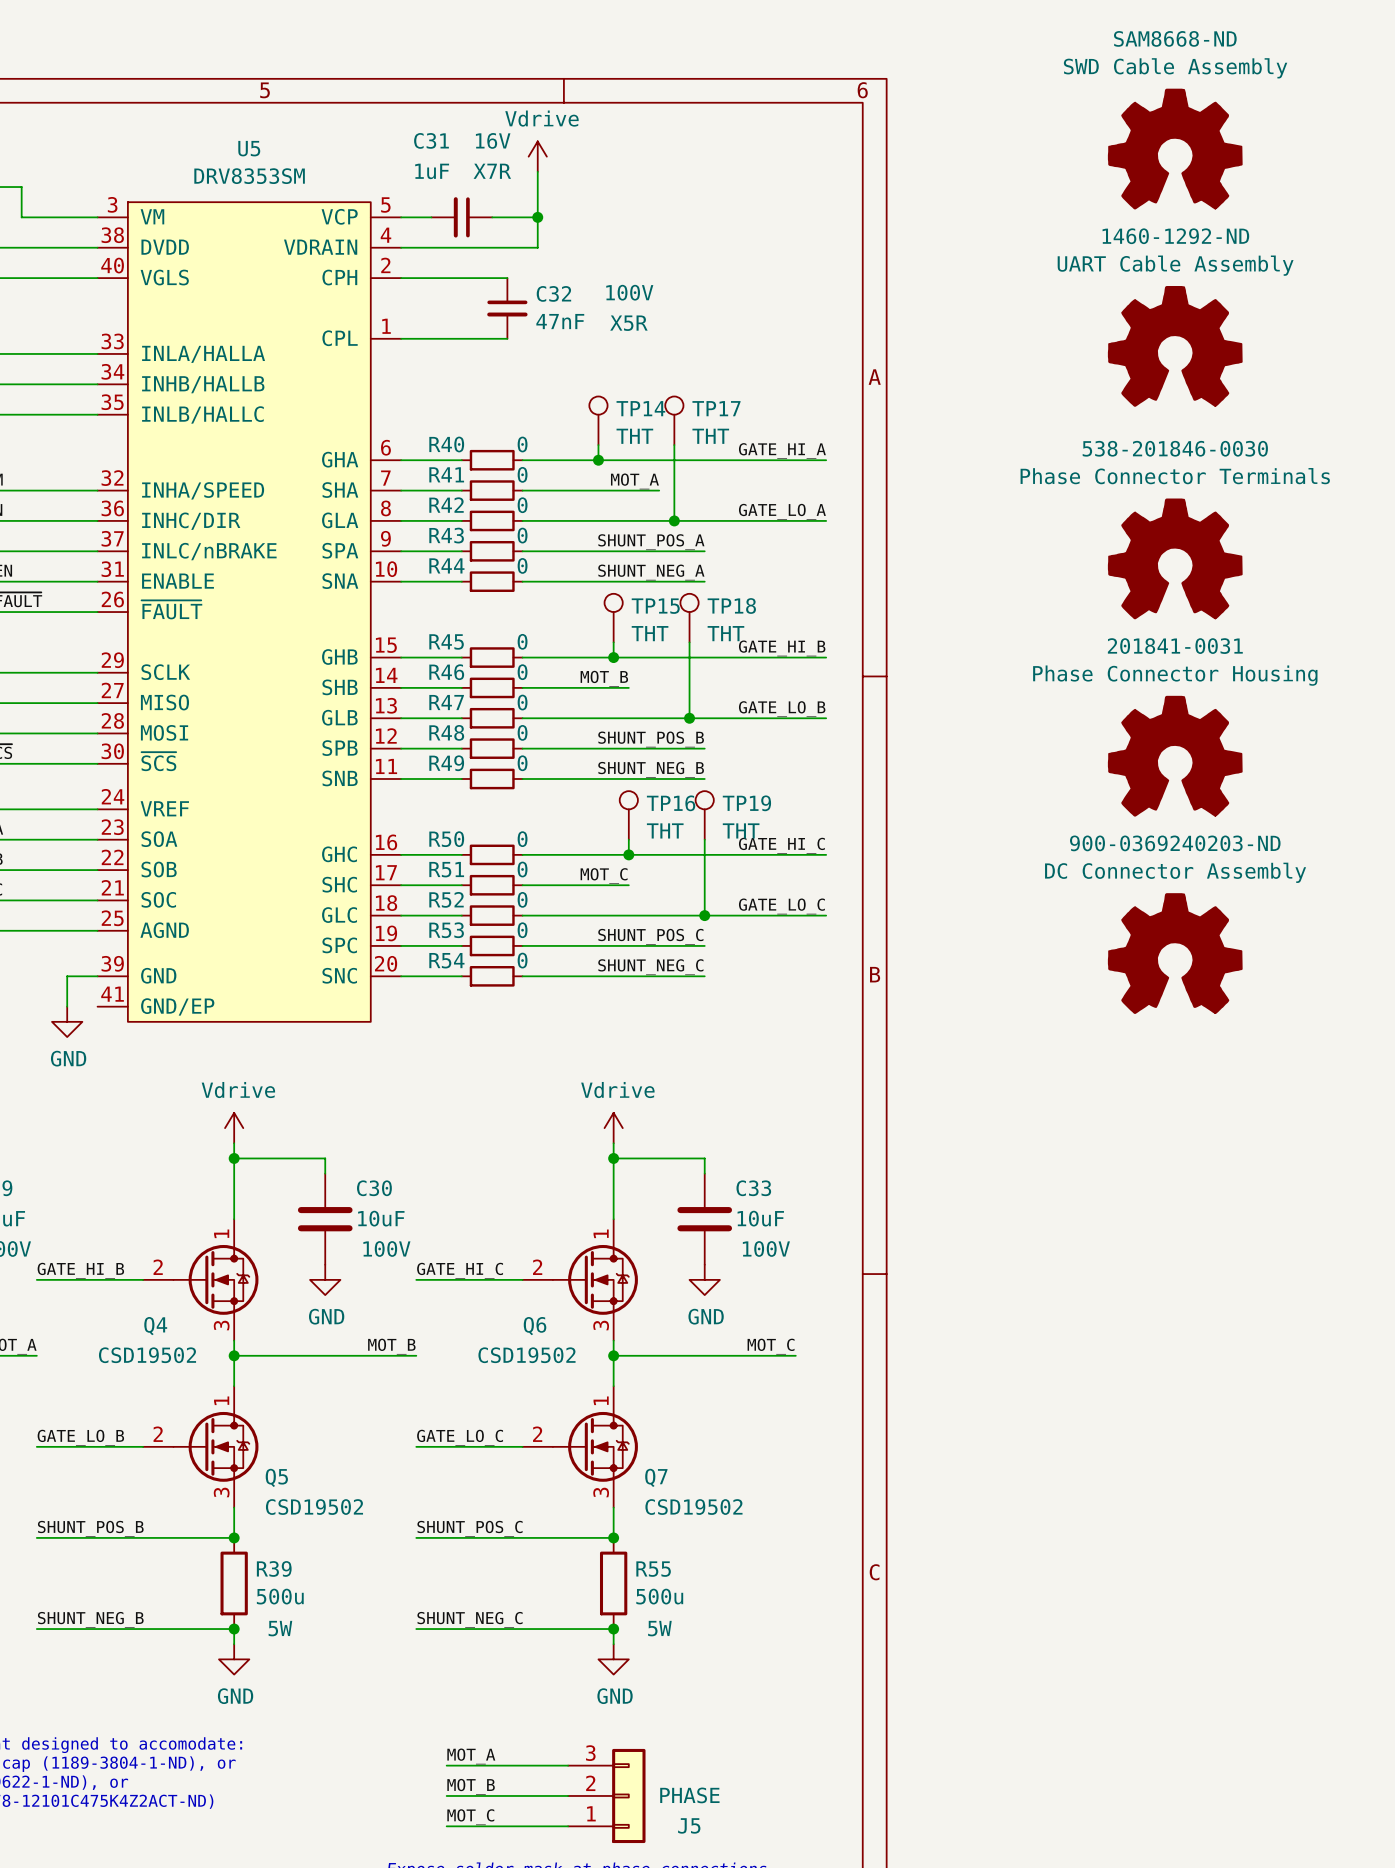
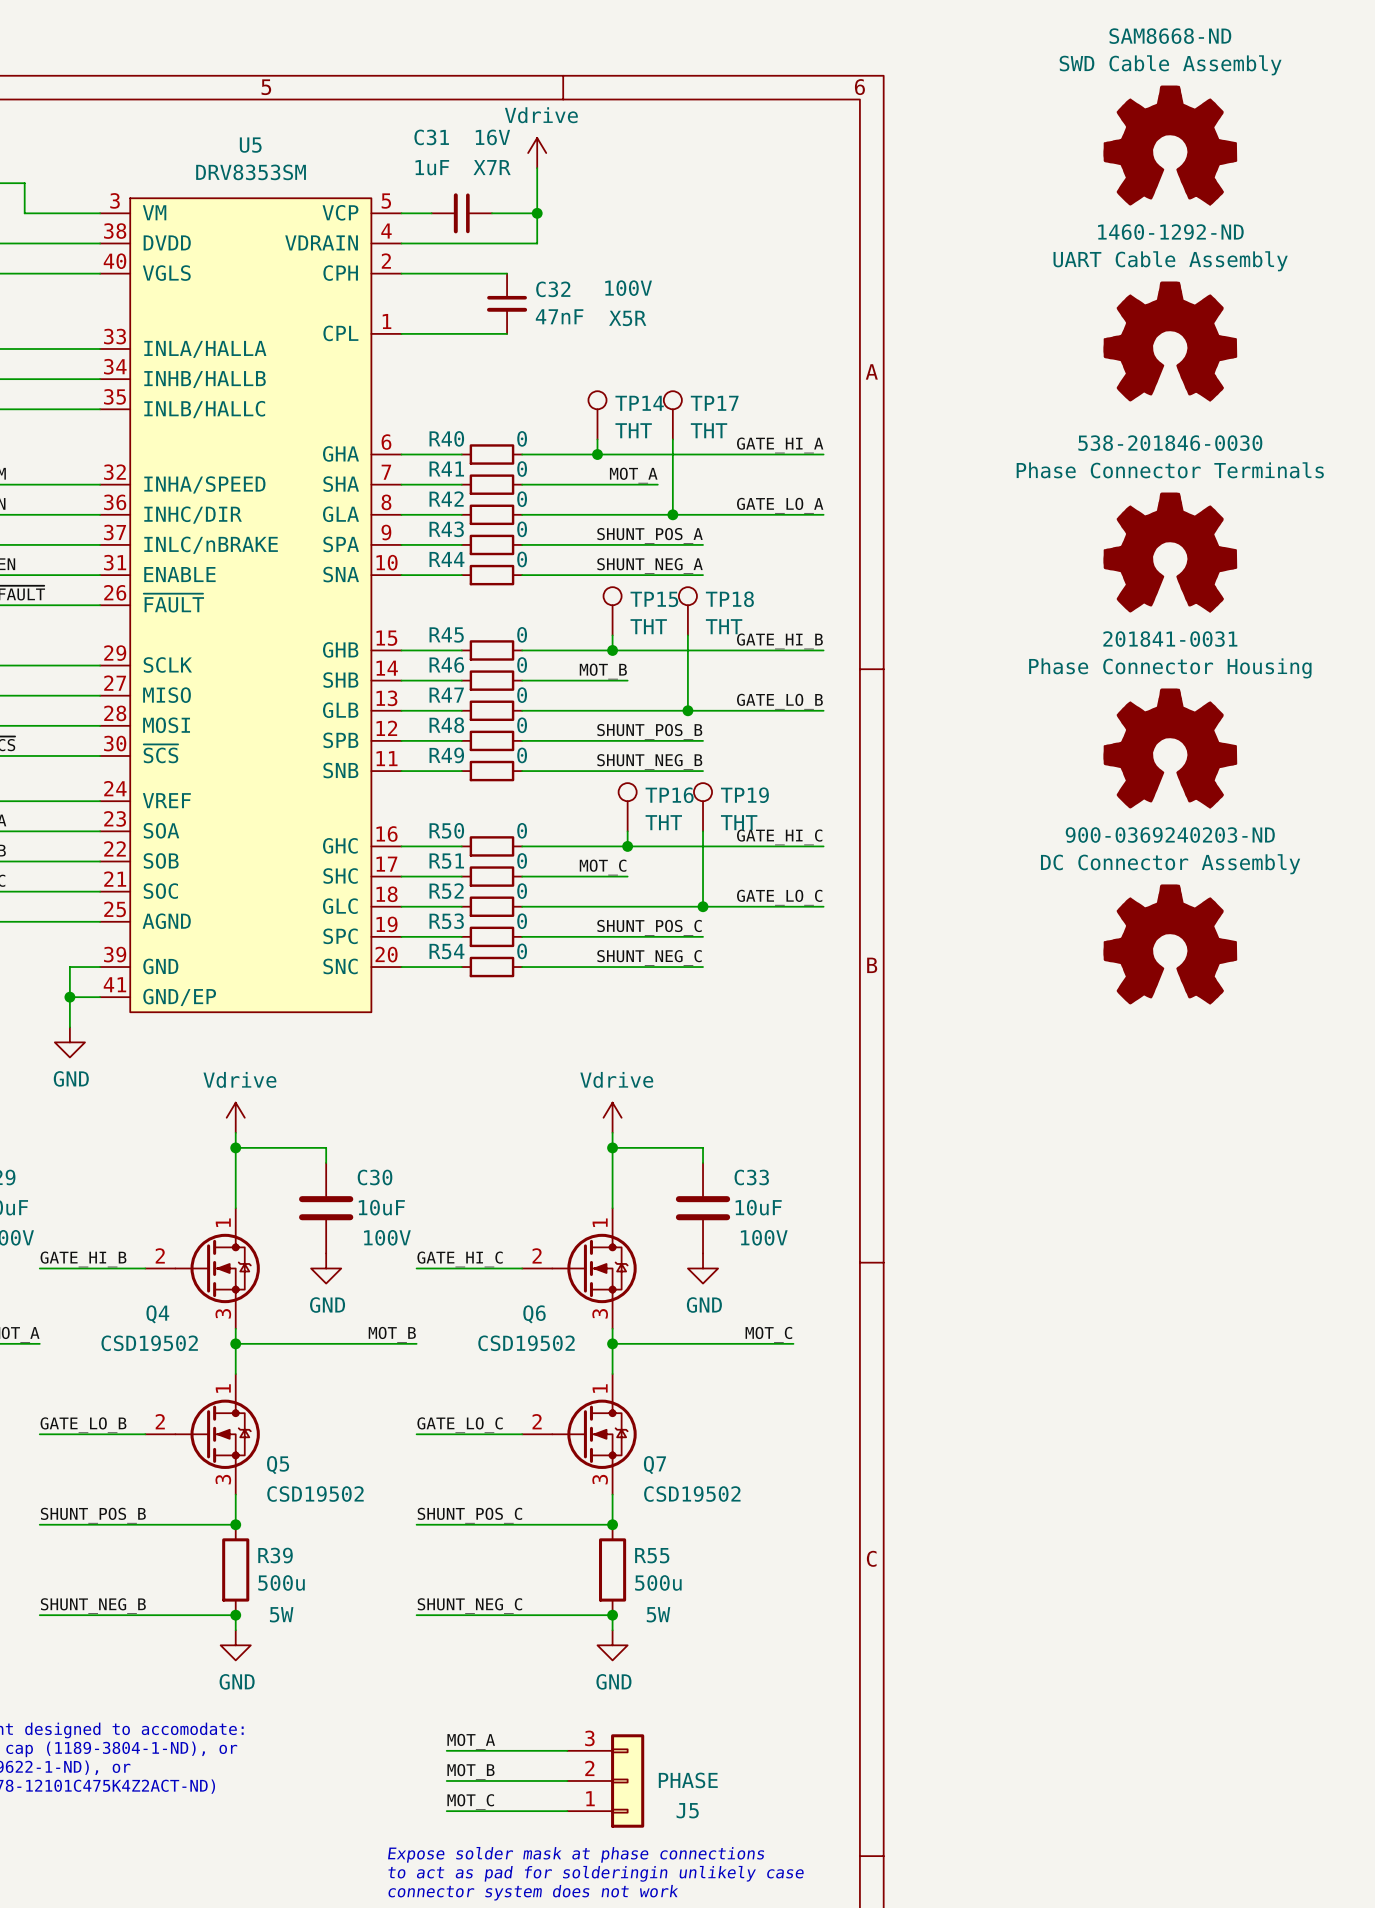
junction: none -> (69, 997)
wire: none -> (100, 997) (69, 997) (69, 1027)
power symbol position: GND (67, 1021) -> GND (69, 1042)

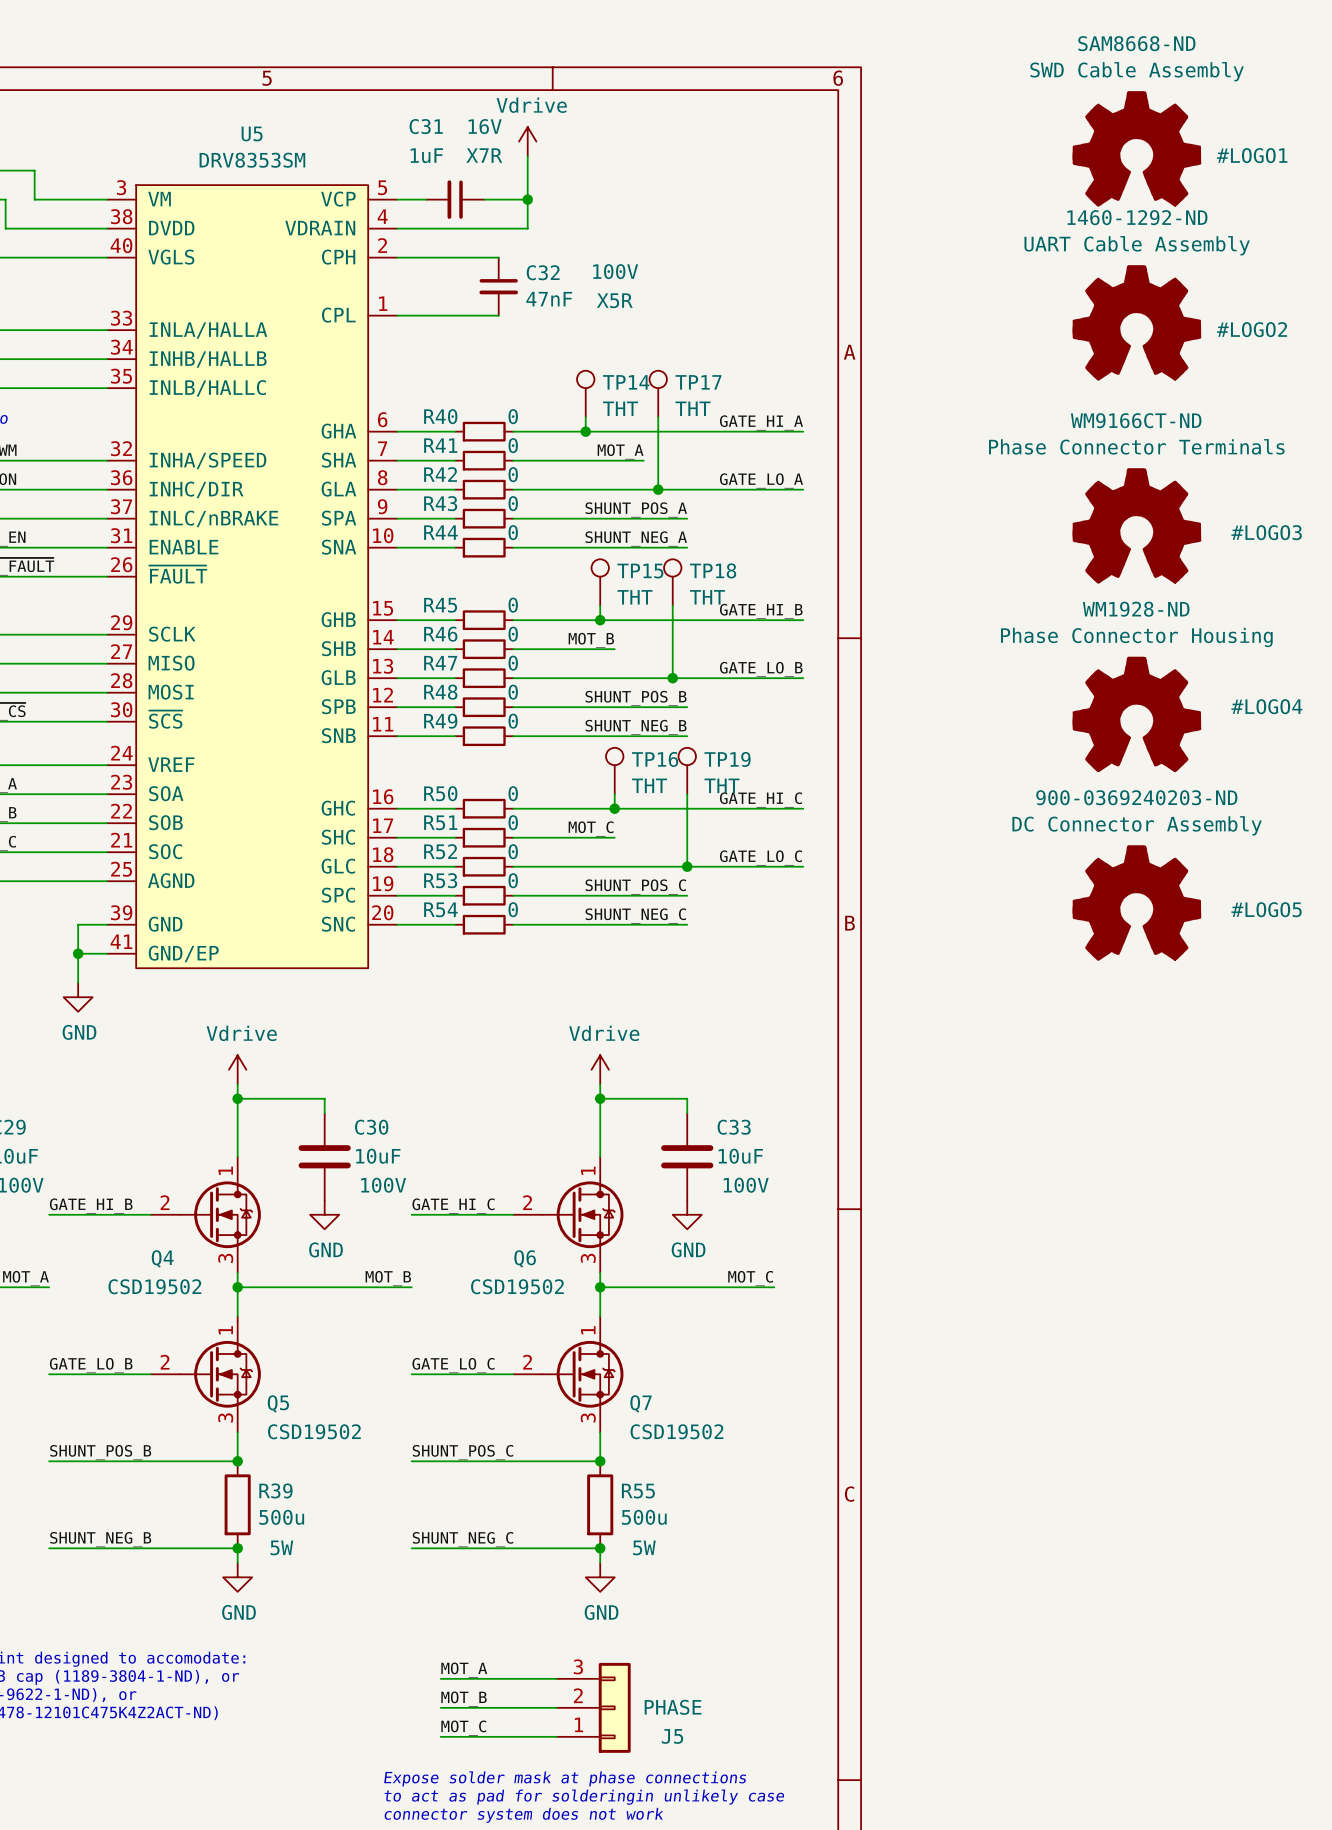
power symbol: (1170, 145) -> none
#LOGO1: none -> (1136, 148)
#LOGO2 name: none -> #LOGO2 (1251, 329)
#LOGO3 text: none -> WM9166CT-ND (1136, 420)
#LOGO3 text: 538-201846-0030 (1170, 443) -> none
#LOGO3 name: none -> #LOGO3 (1266, 532)
#LOGO4 text: none -> WM1928-ND (1136, 609)
#LOGO4 text: 201841-0031 (1170, 639) -> none
#LOGO4 name: none -> #LOGO4 (1266, 706)
#LOGO5 name: none -> #LOGO5 (1266, 909)

